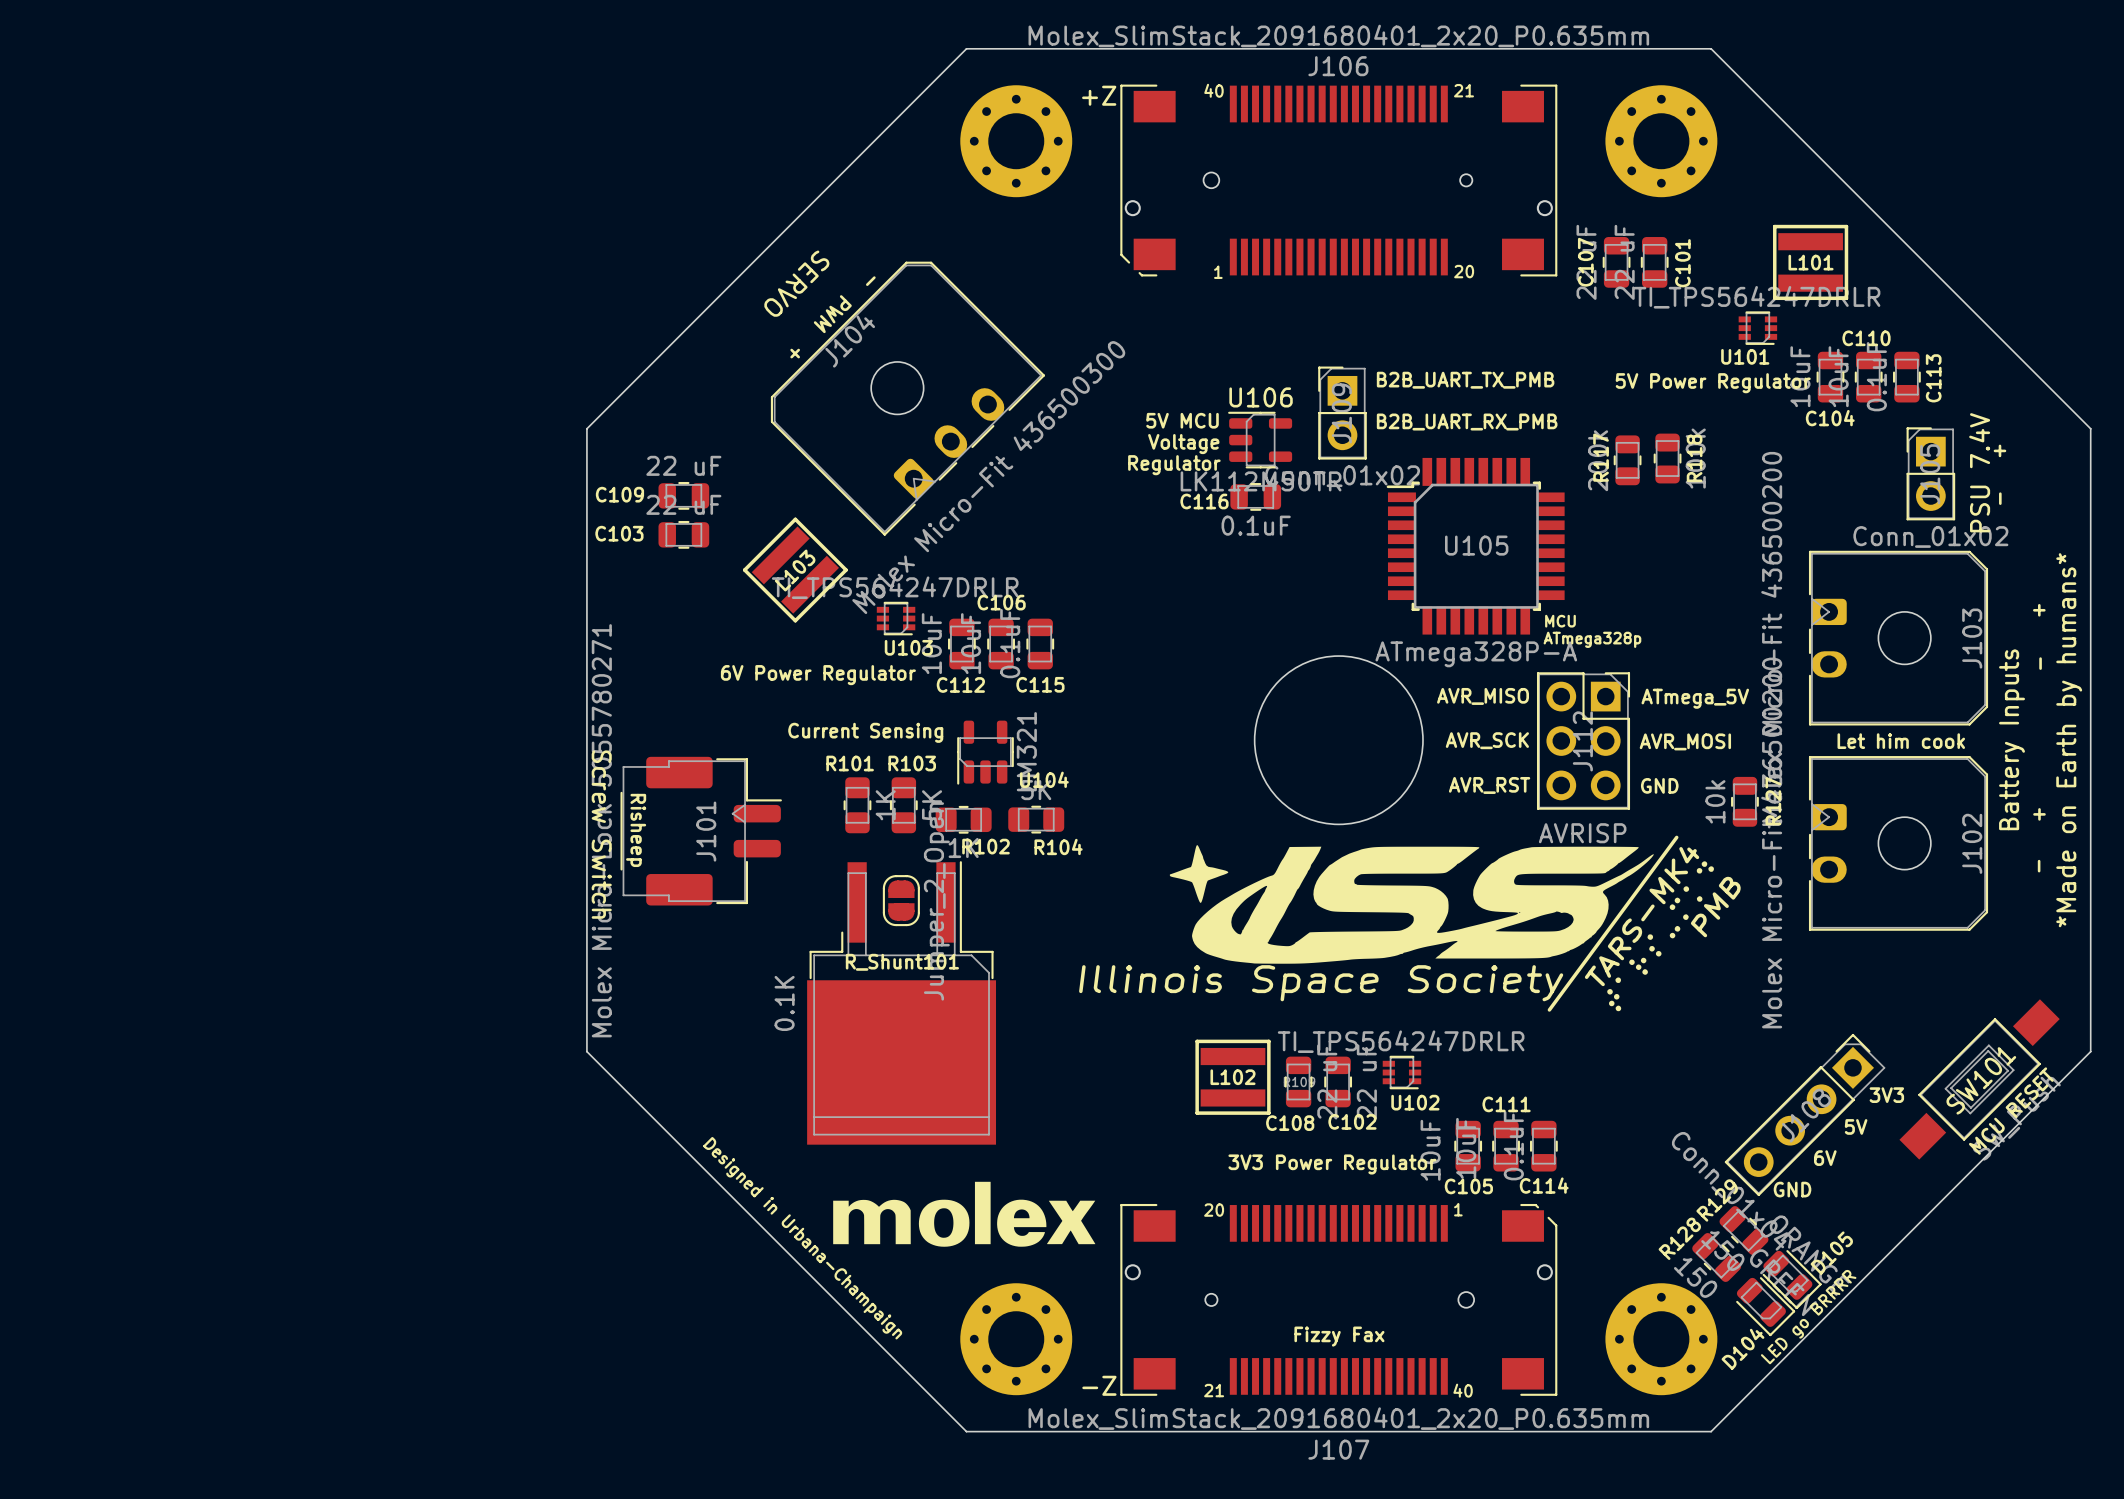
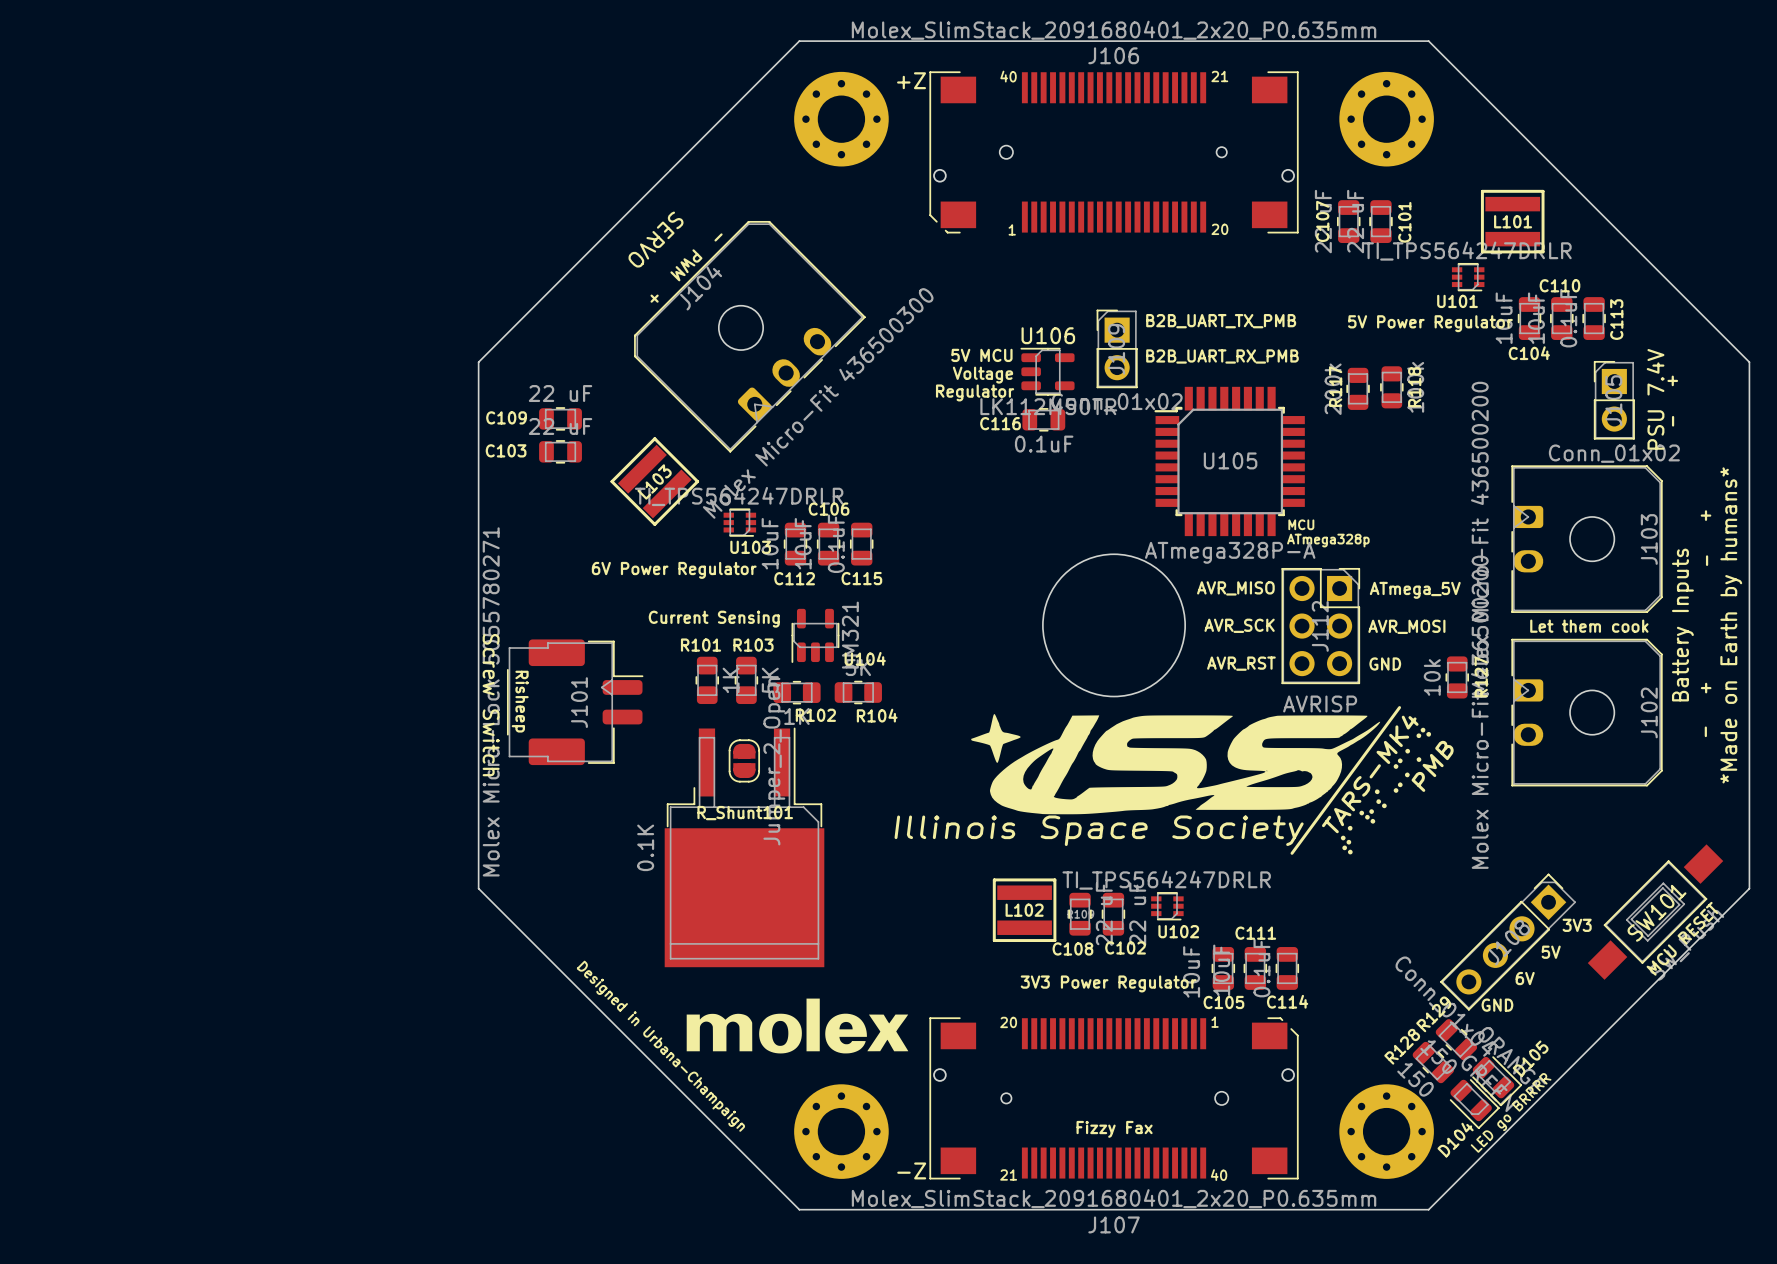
text: Let him cook (1901, 741) -> Let them cook (1589, 626)

